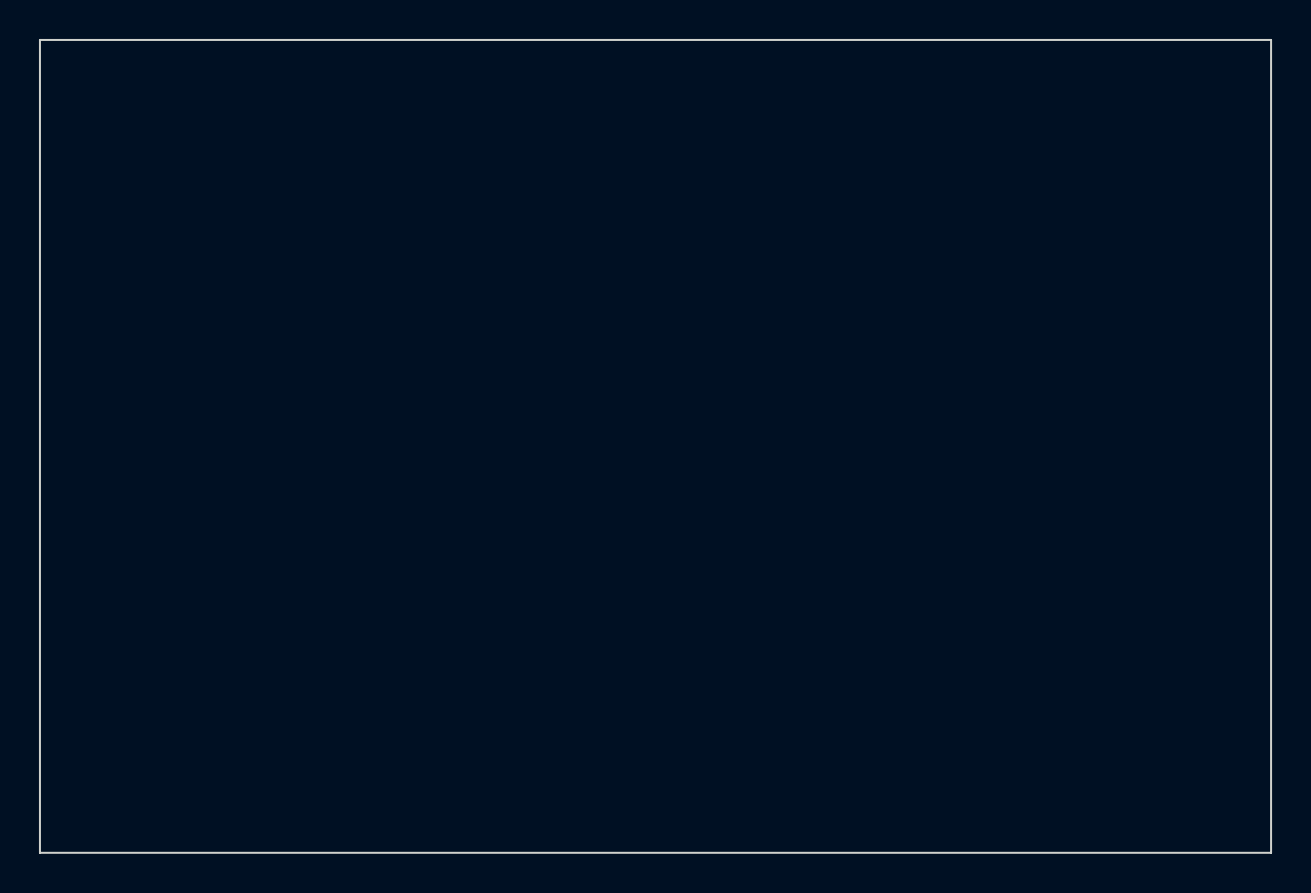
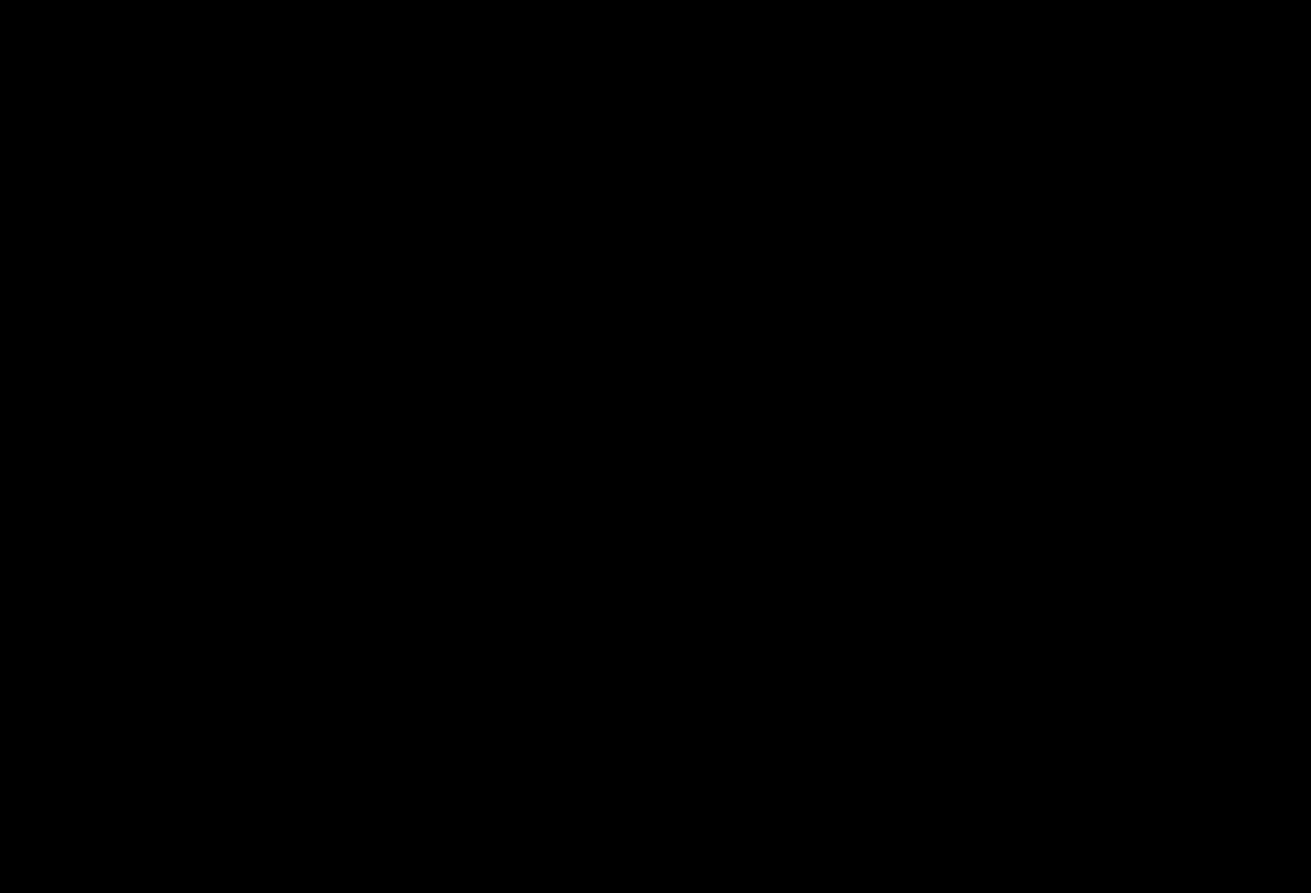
board edge: (1271, 39) (39, 39) (39, 852) (1271, 852) (1271, 39) -> none

